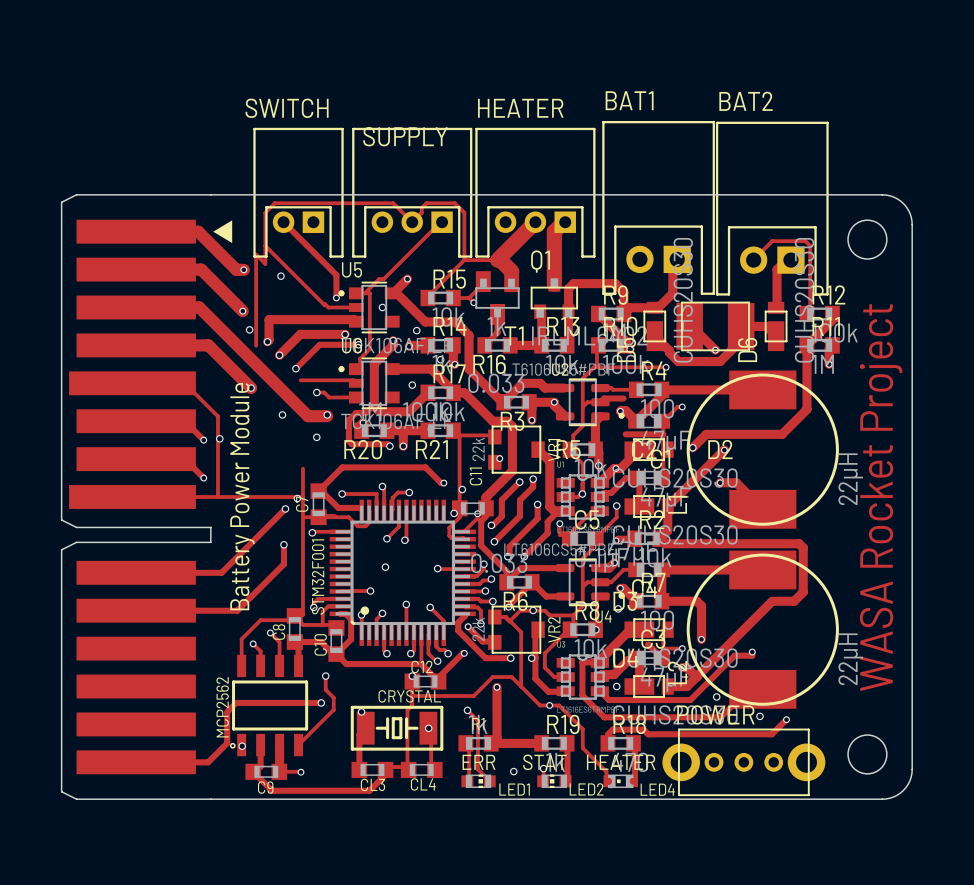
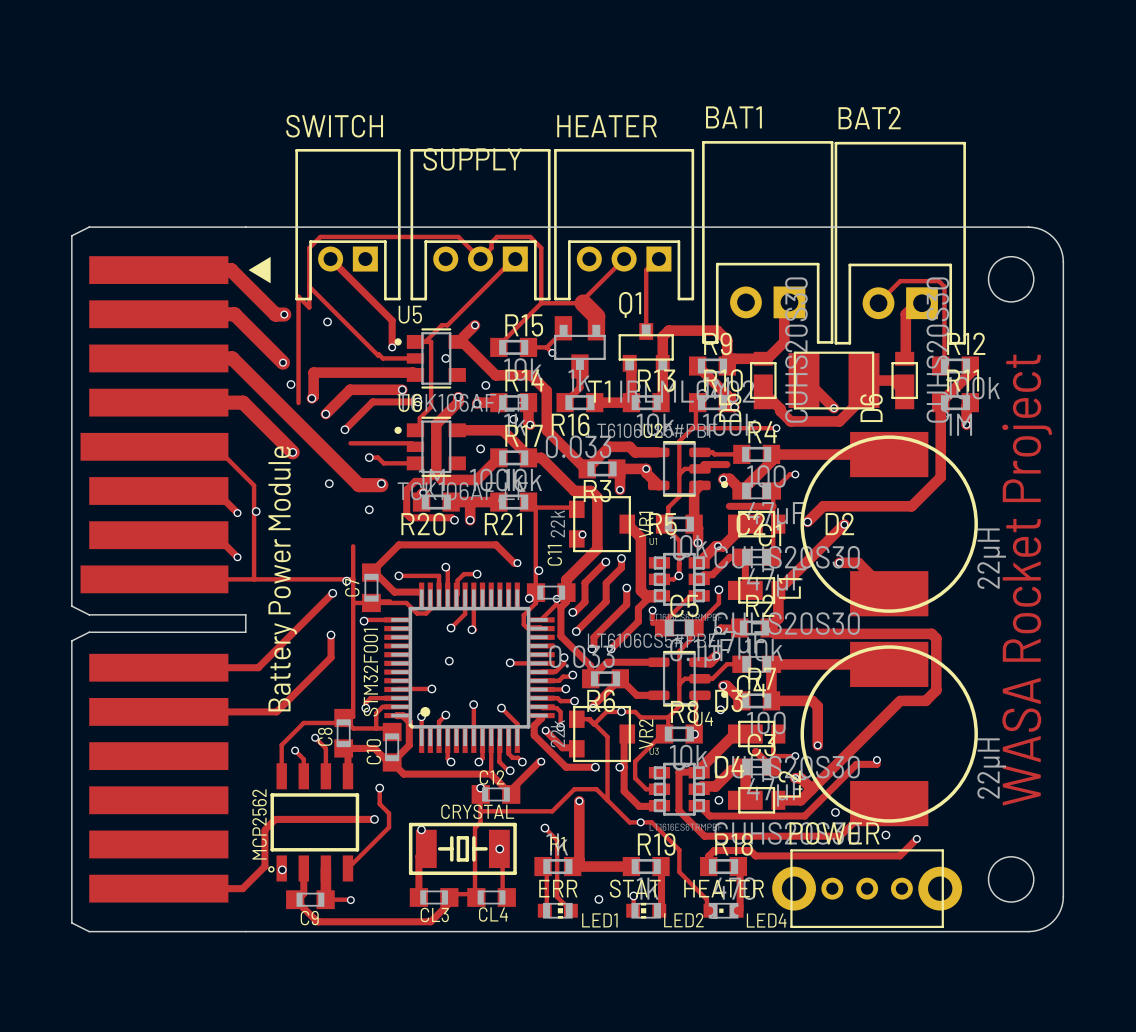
track width: thick (535, 222) (497, 260) -> thin (624, 259) (579, 303)
track width: thick (563, 222) (554, 231) (554, 284) -> thin (657, 259) (646, 270) (646, 331)

